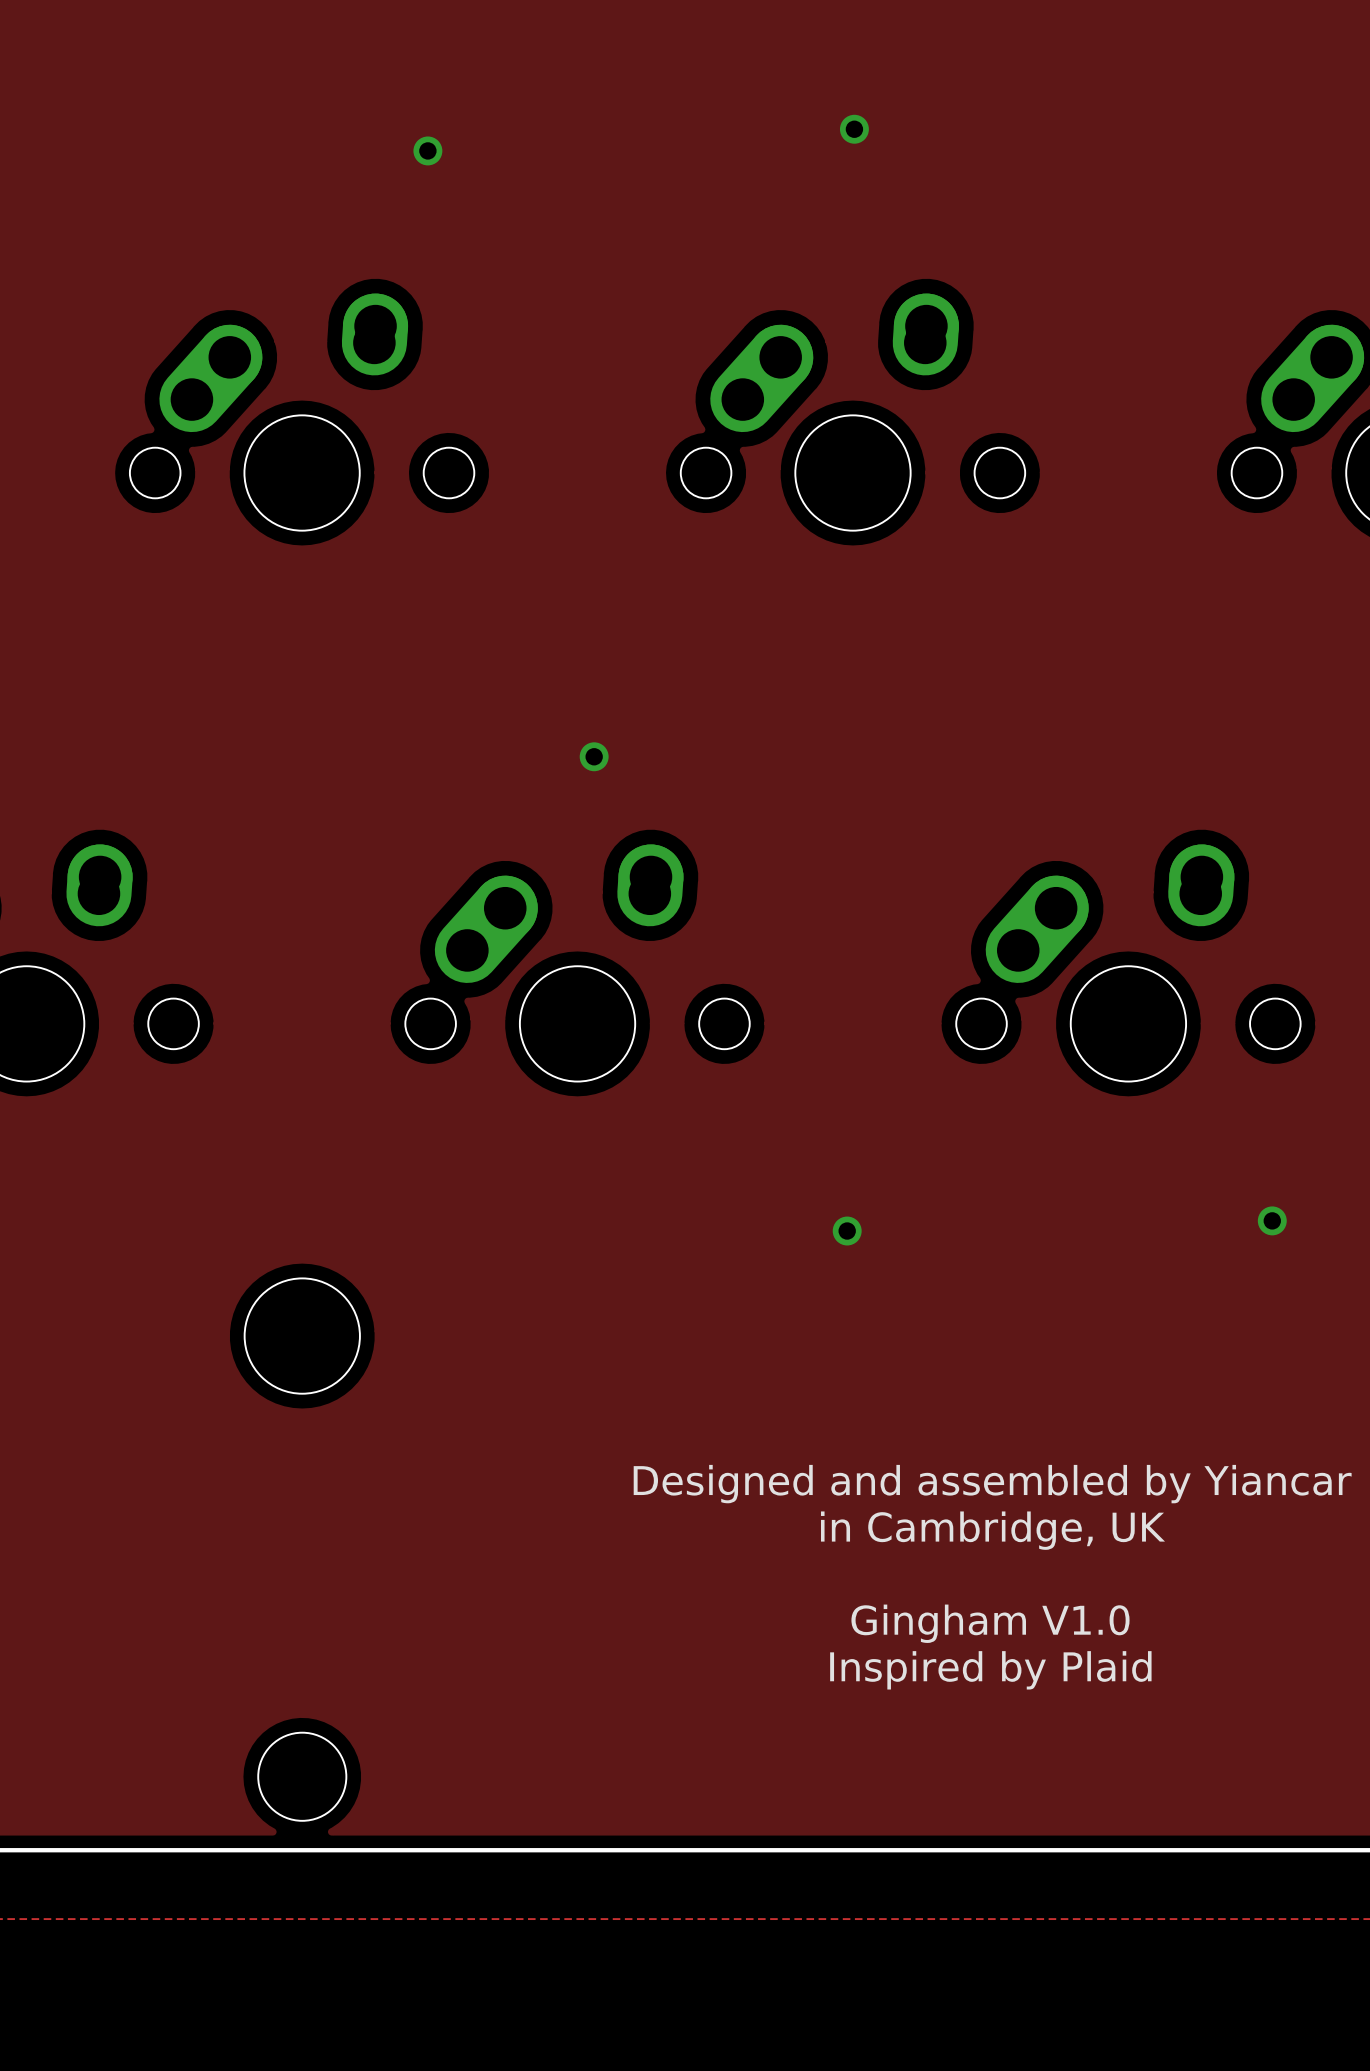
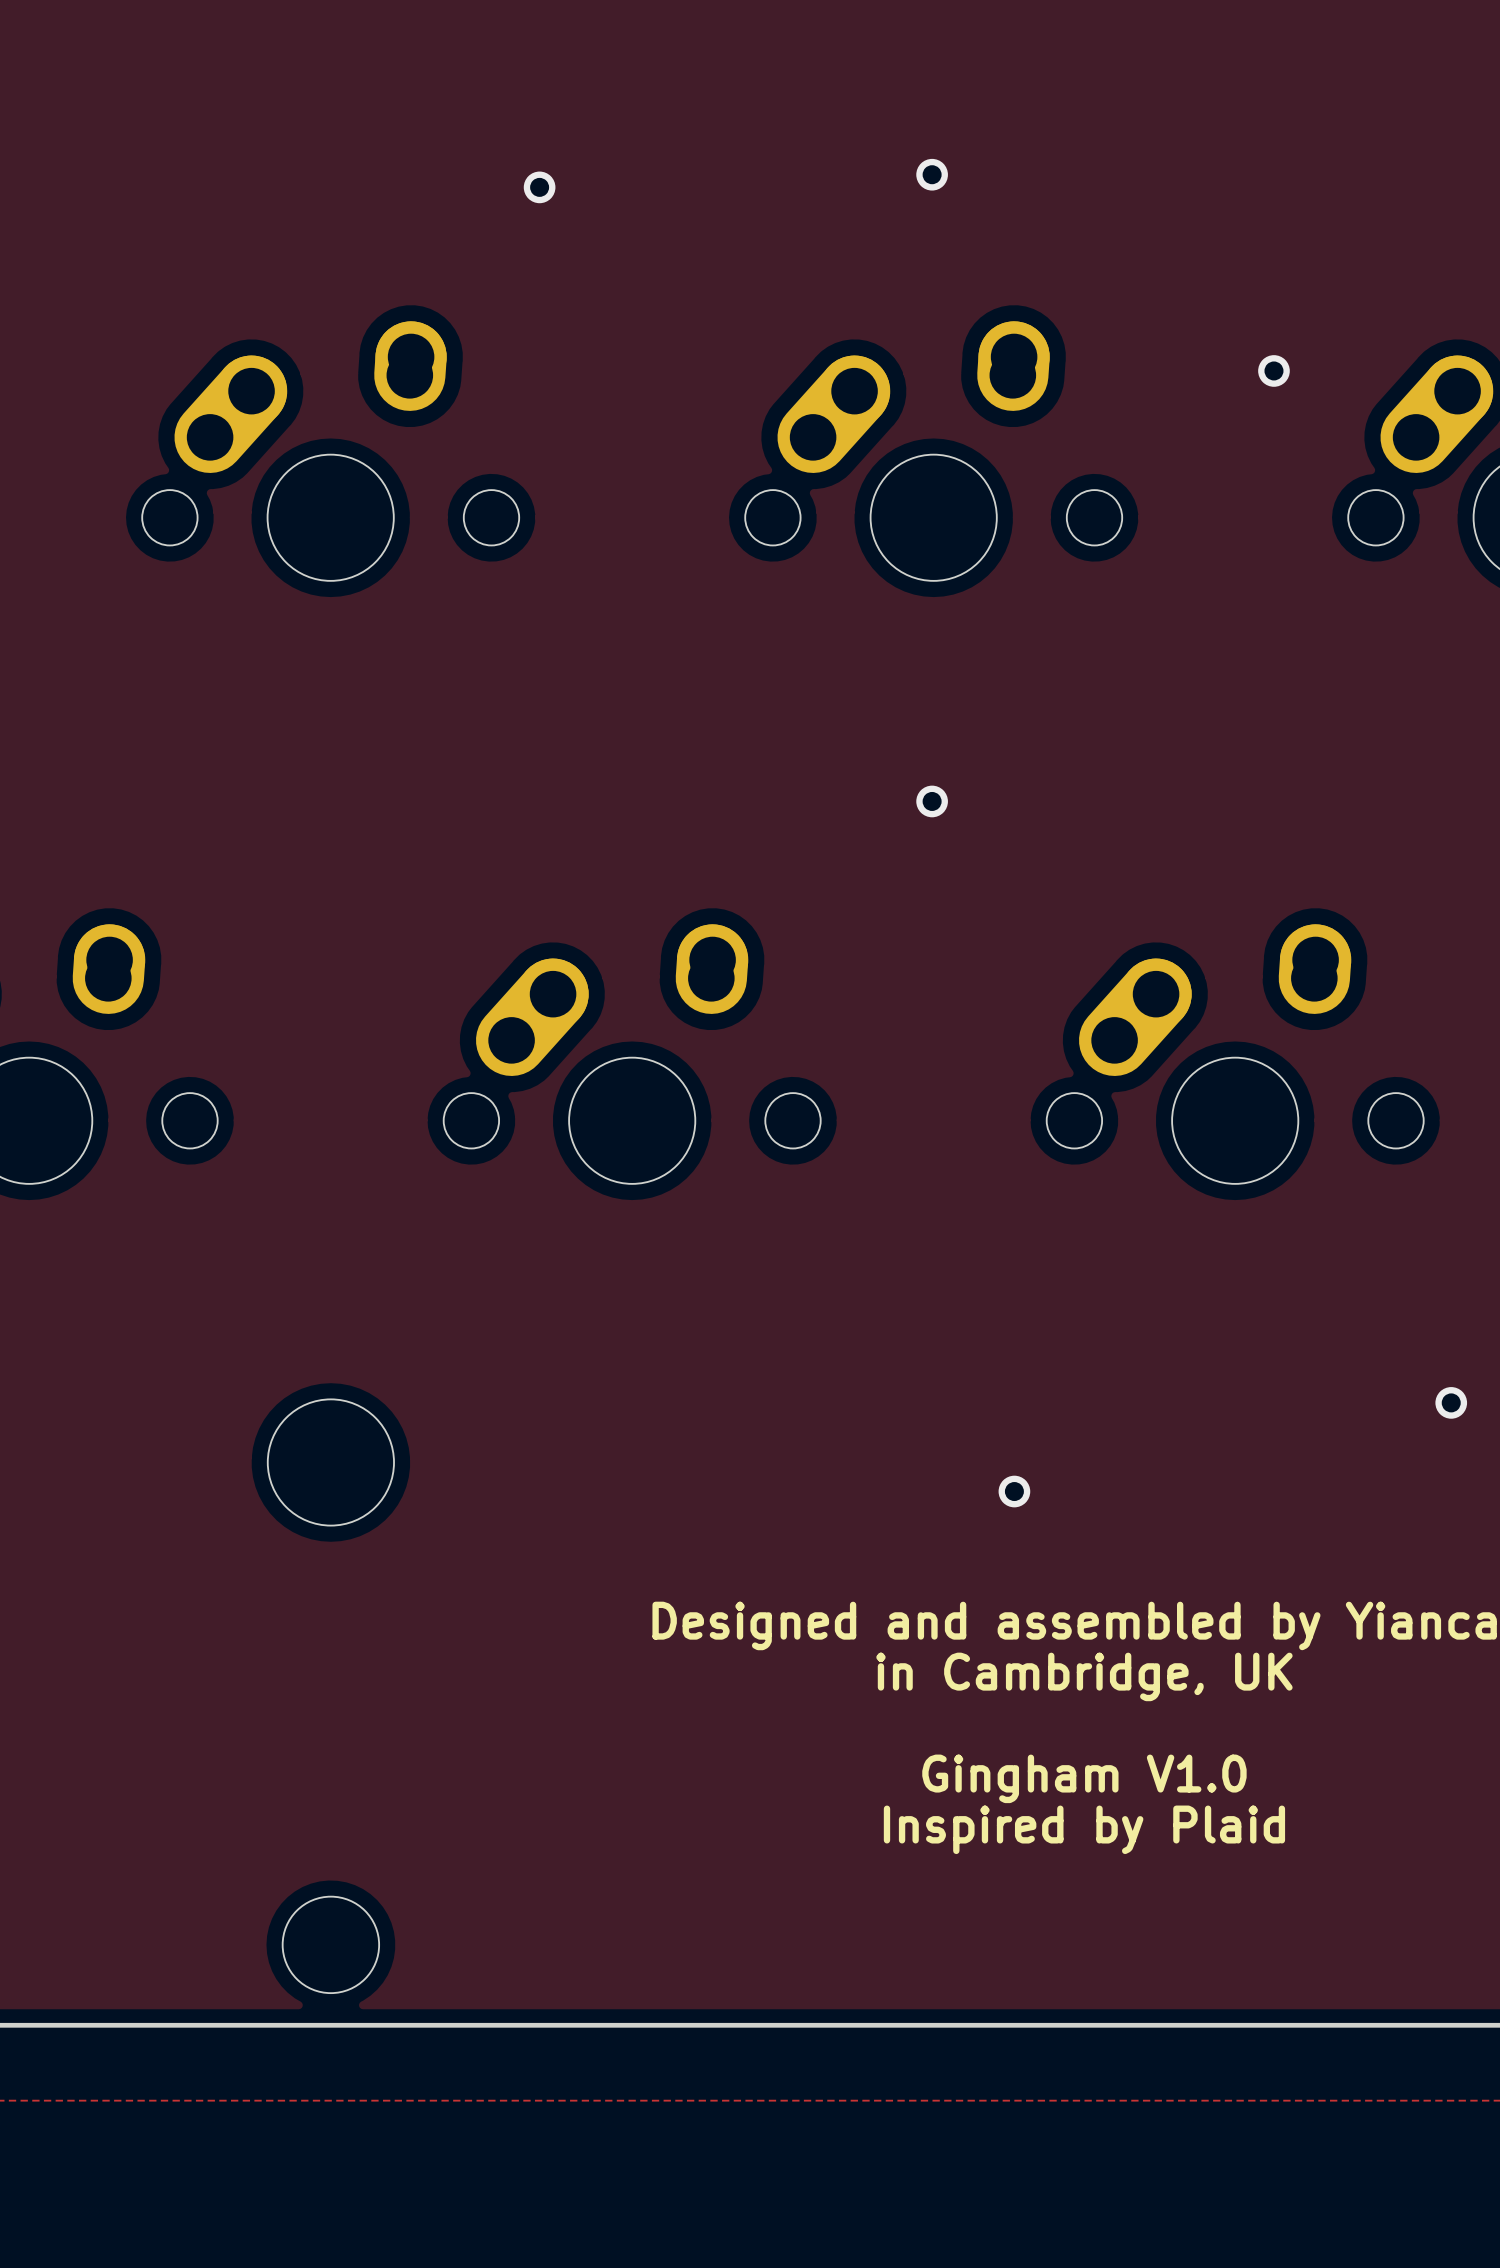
via position: (854, 129) -> (932, 174)
via position: (427, 150) -> (539, 187)
via: none -> (1273, 370)
via: none -> (932, 801)
via: (594, 756) -> none
via position: (1272, 1220) -> (1451, 1402)
via position: (847, 1231) -> (1014, 1491)

